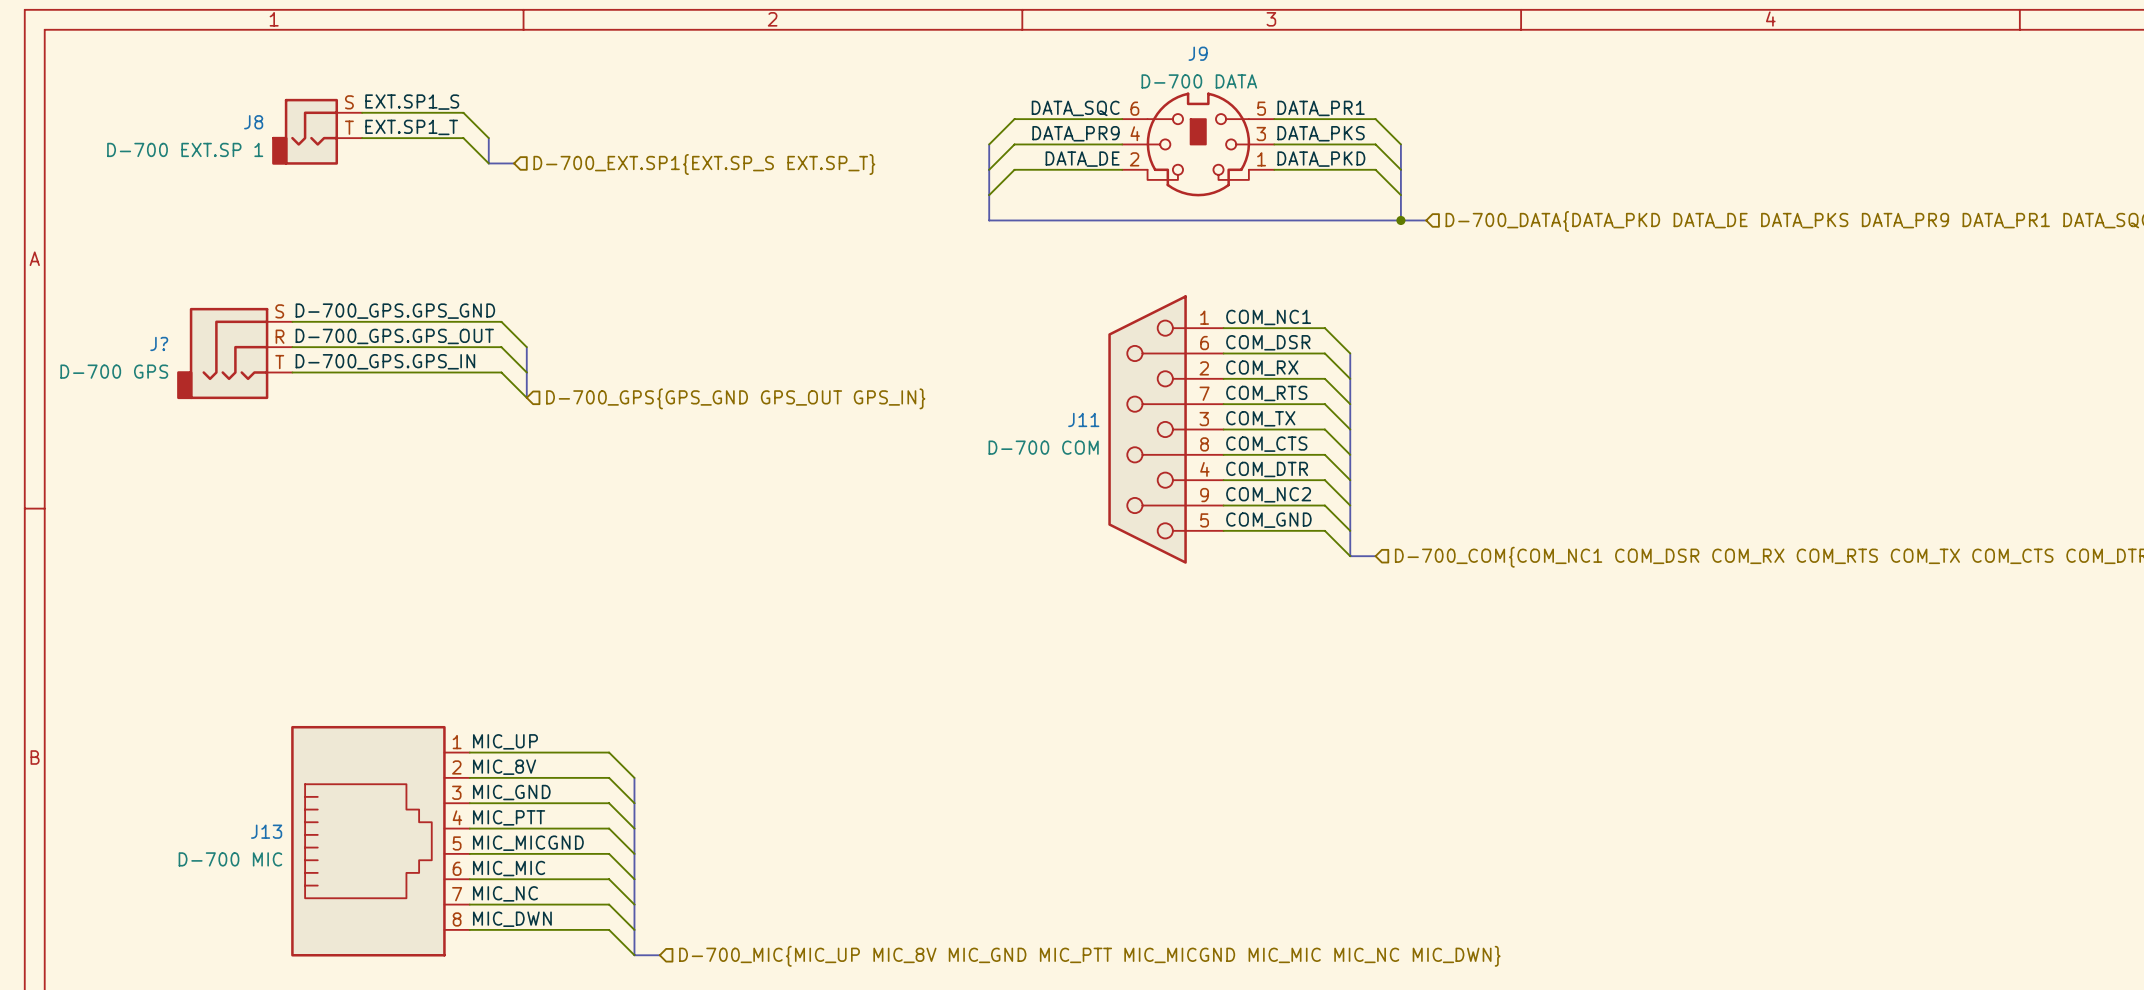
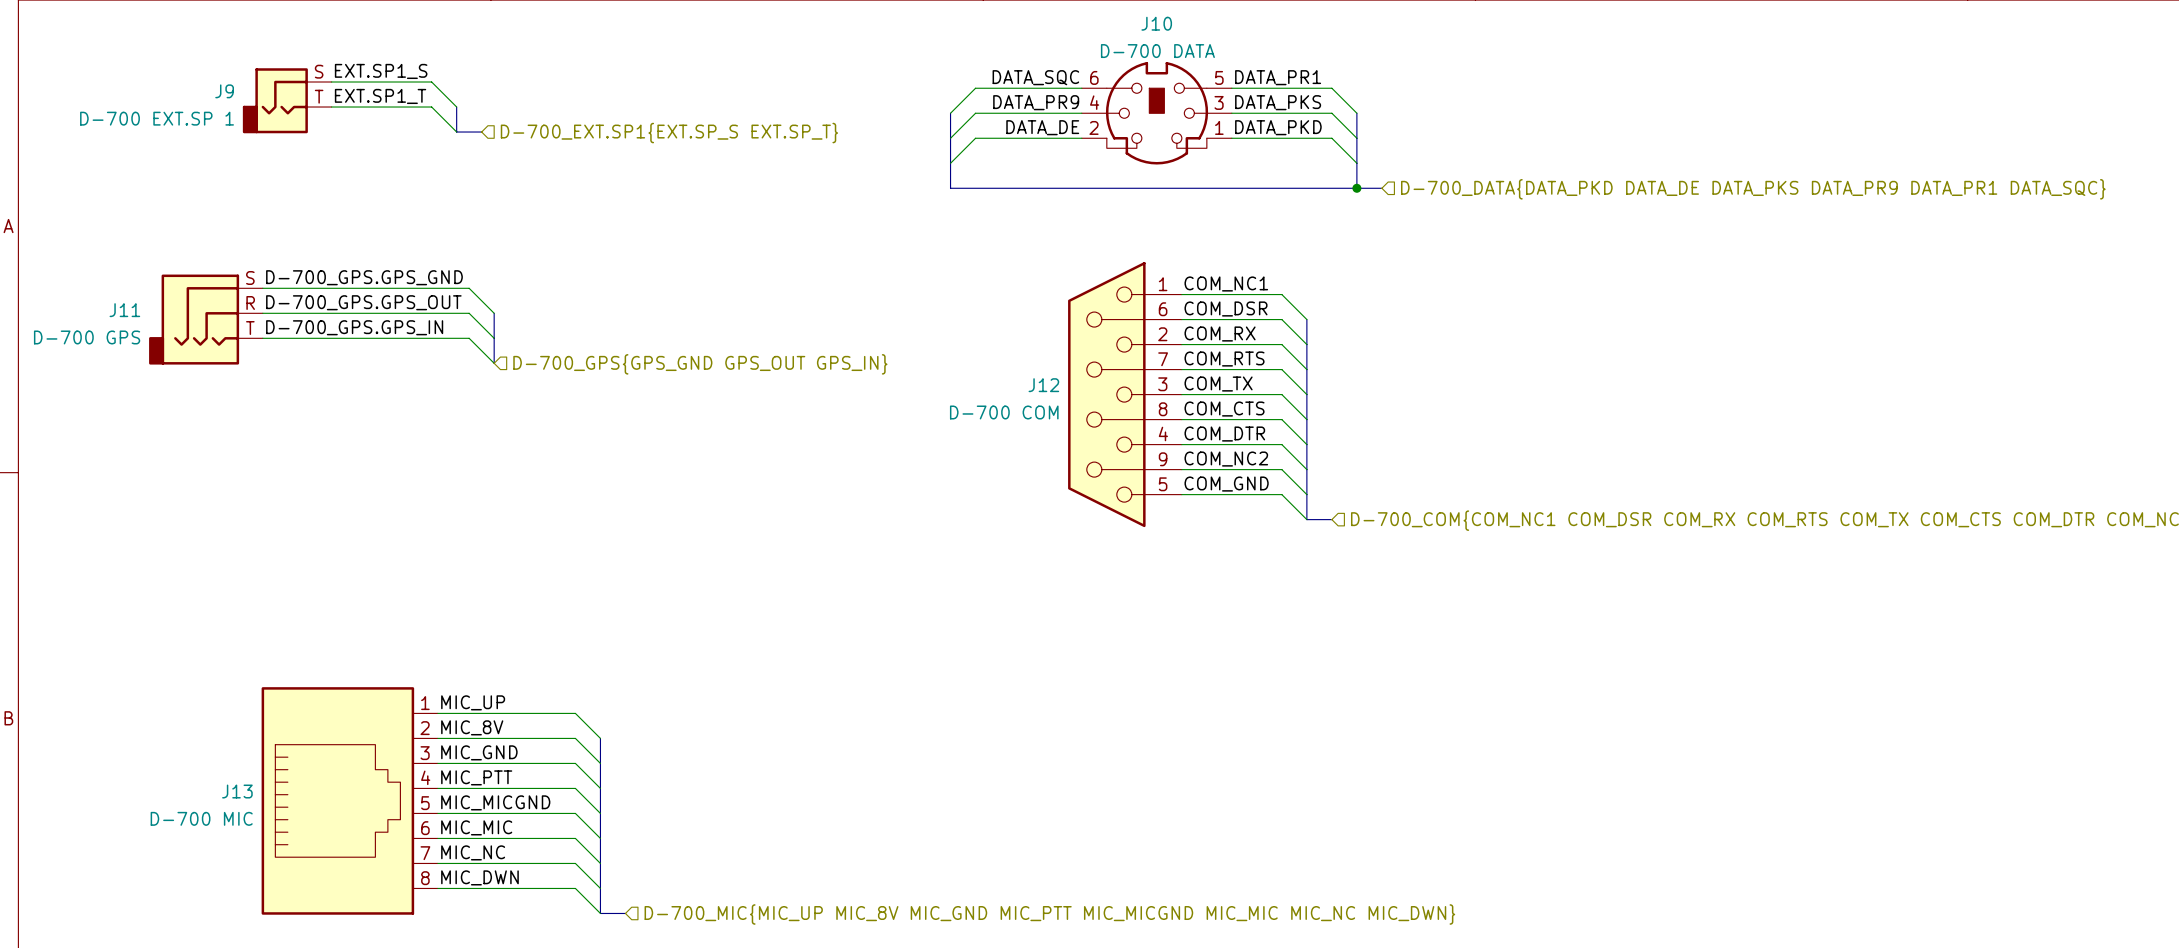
J9 name: J9 (1198, 53) -> J10 (1156, 23)
J8 name: J8 (253, 122) -> J9 (224, 91)
J? name: J? (159, 343) -> J11 (124, 310)
J11 name: J11 (1083, 419) -> J12 (1043, 385)

